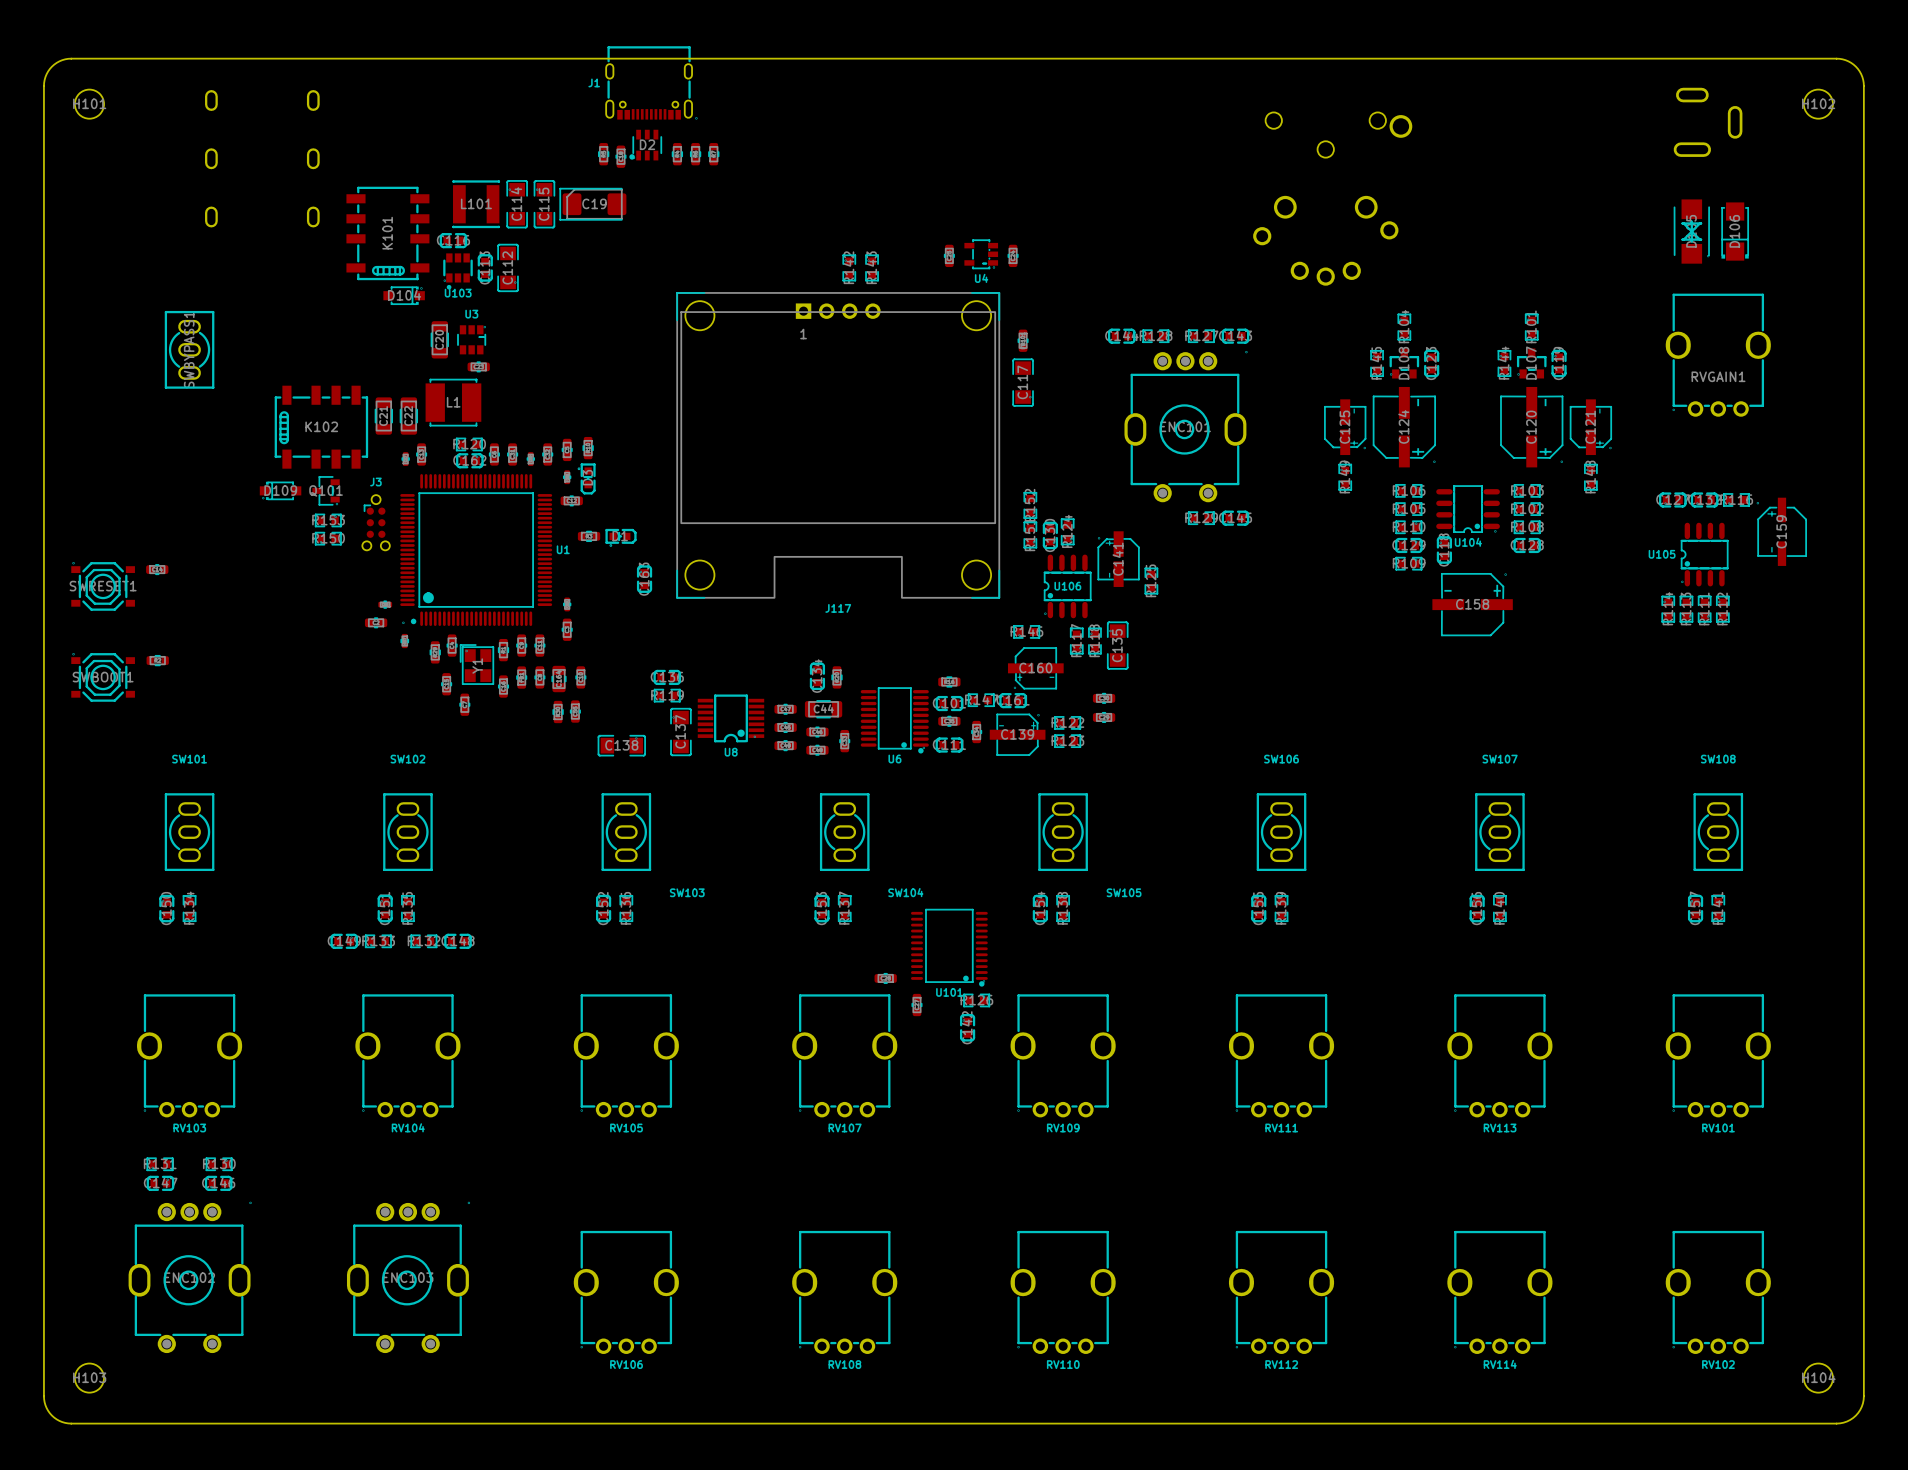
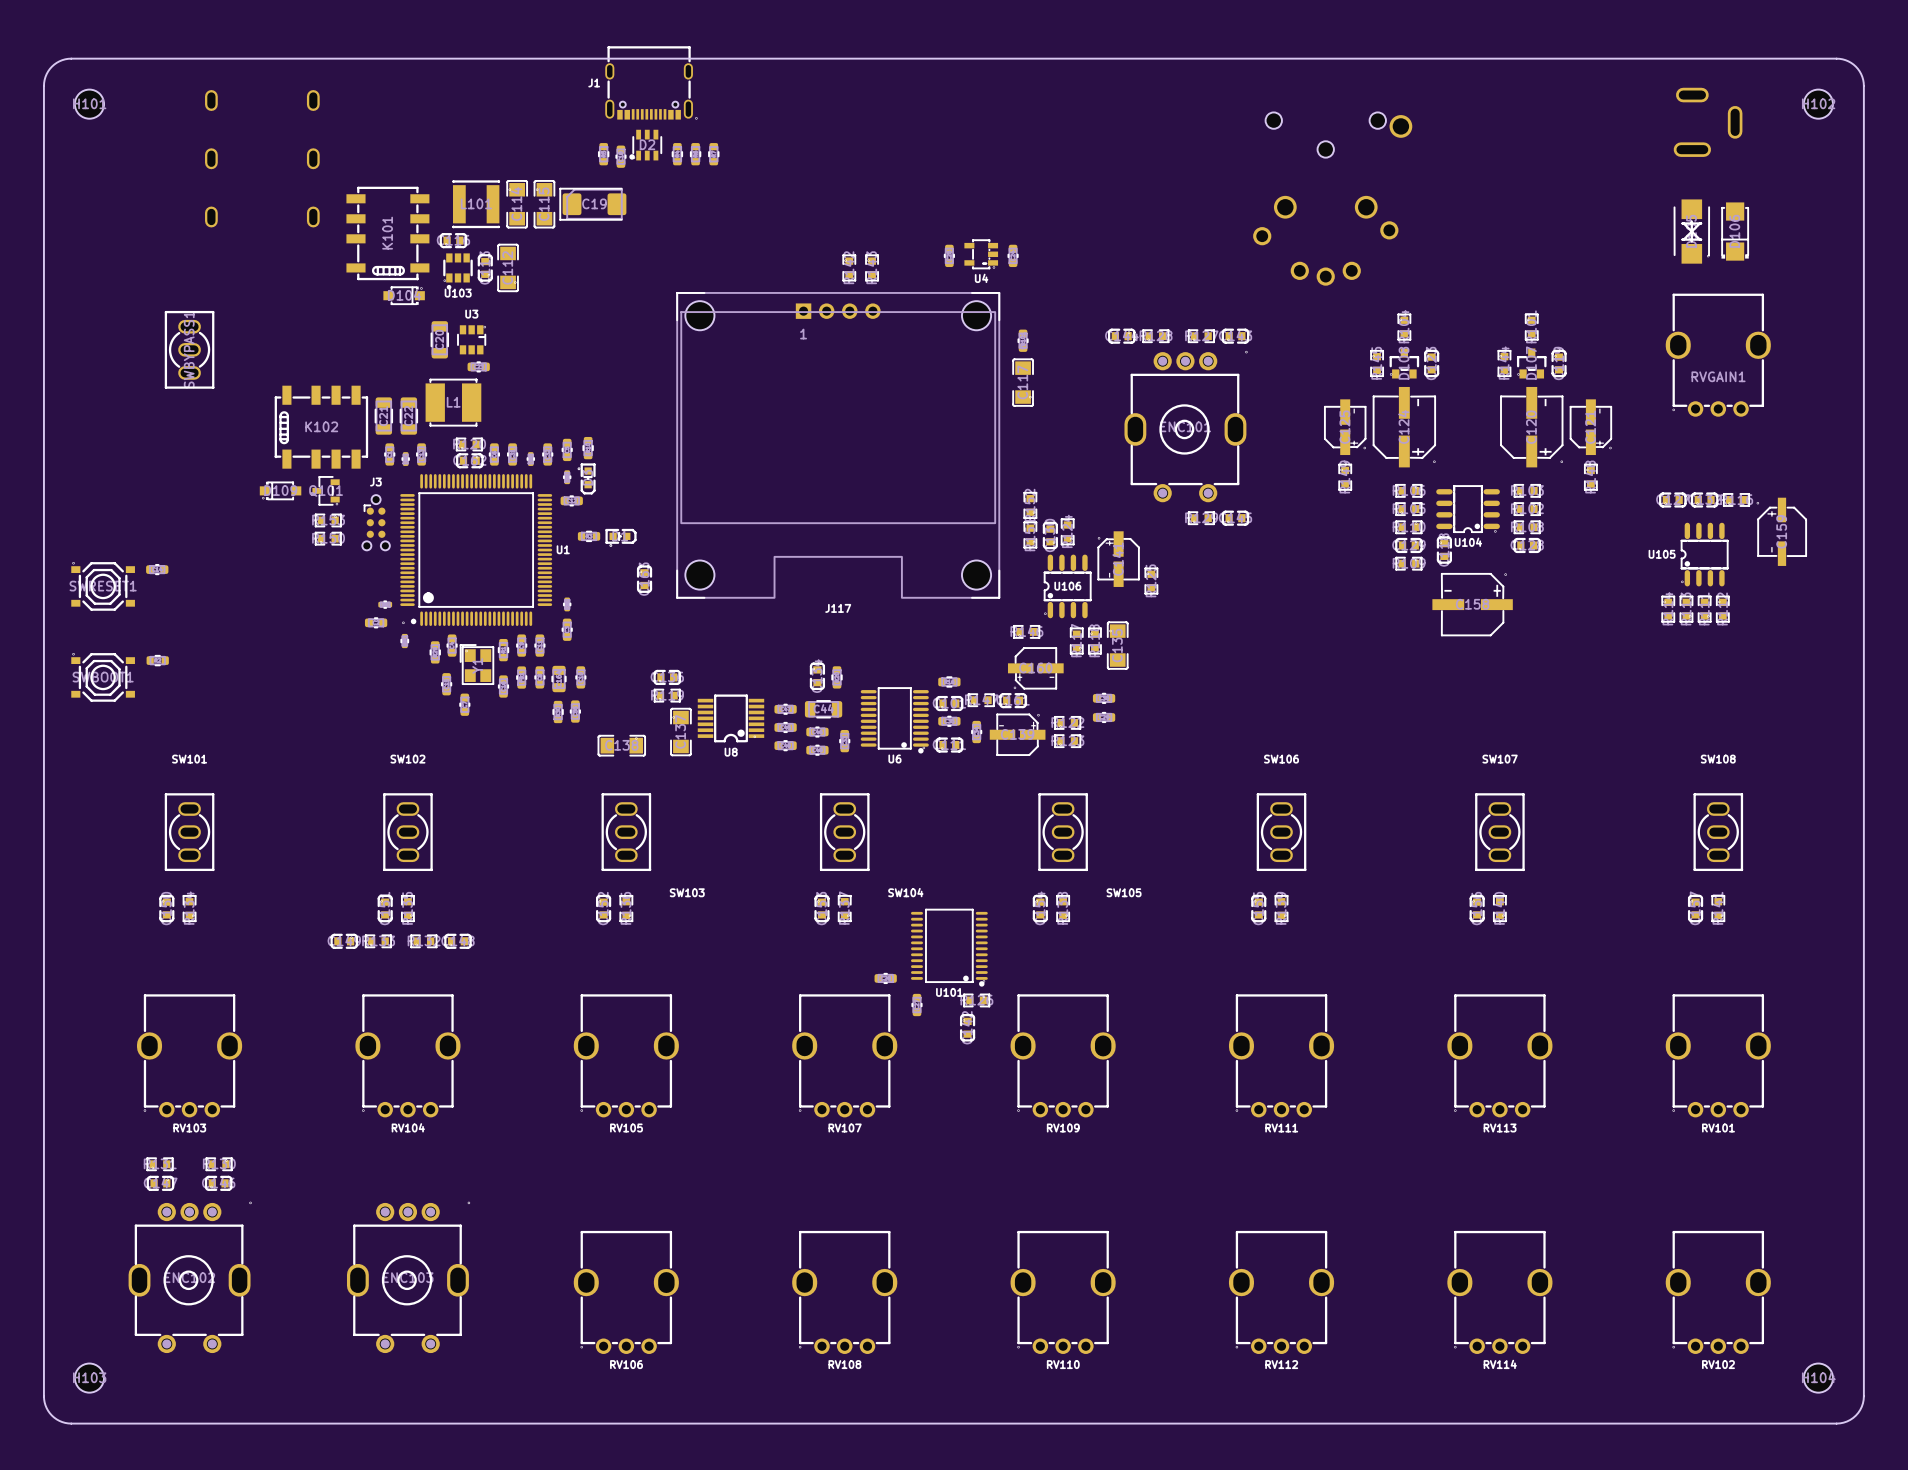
part: none -> (389, 454)

